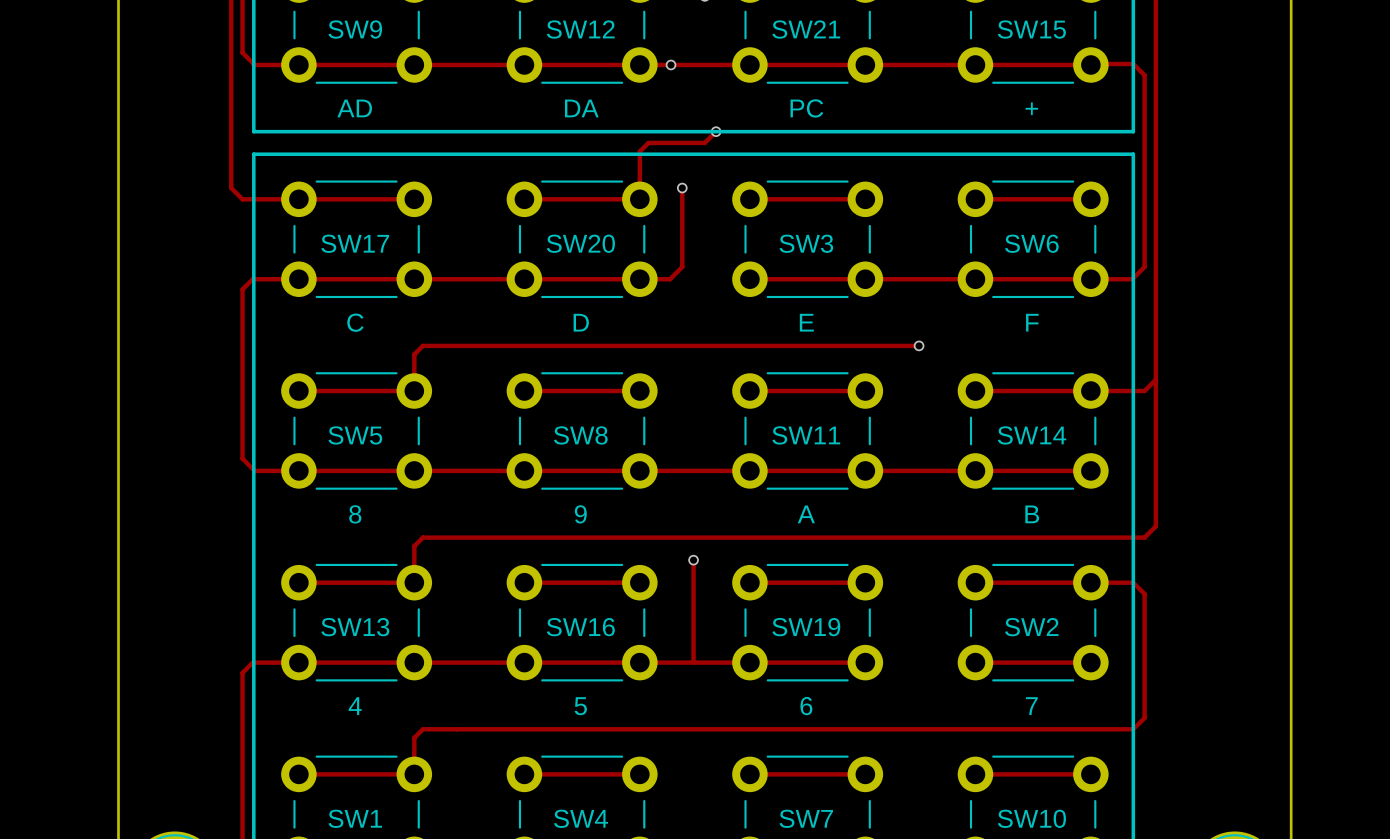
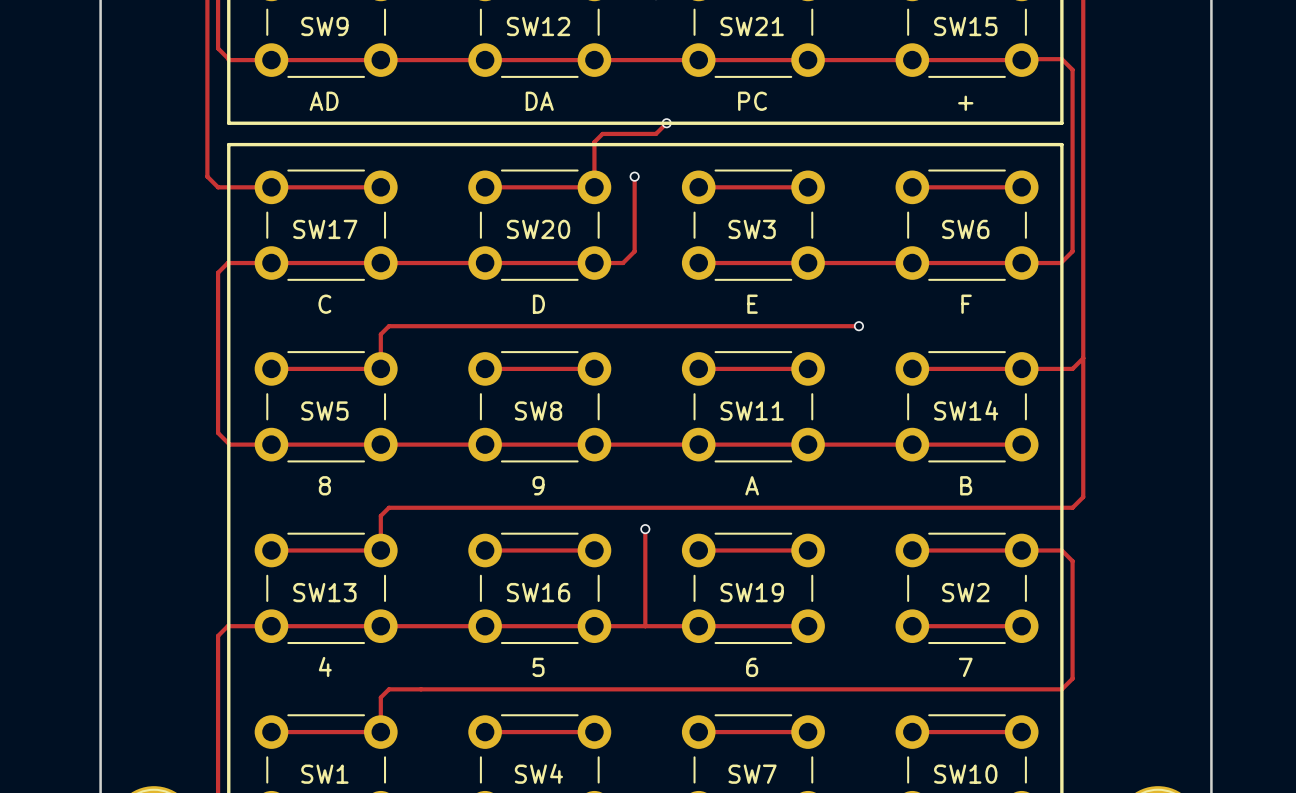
via: (671, 64) -> none

